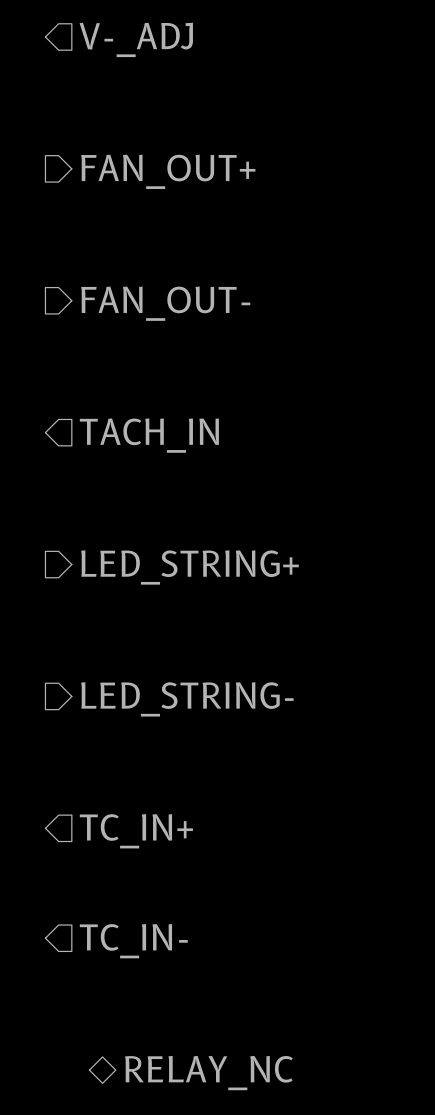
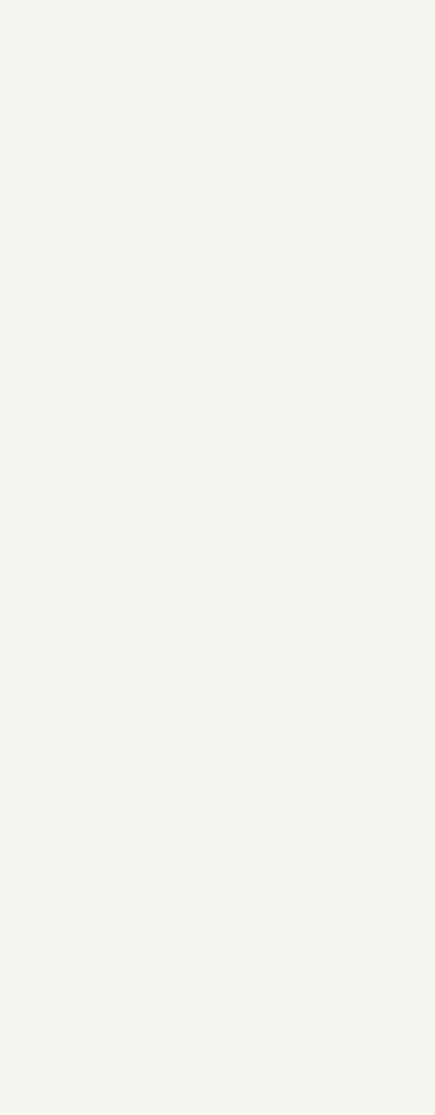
hierarchical label: V-_ADJ (136, 39) -> none
hierarchical label: FAN_OUT+ (168, 171) -> none
hierarchical label: FAN_OUT- (165, 303) -> none
hierarchical label: TACH_IN (149, 435) -> none
hierarchical label: LED_STRING+ (190, 567) -> none
hierarchical label: LED_STRING- (187, 699) -> none
hierarchical label: TC_IN+ (136, 831) -> none
hierarchical label: TC_IN- (133, 941) -> none
hierarchical label: RELAY_NC (208, 1073) -> none

